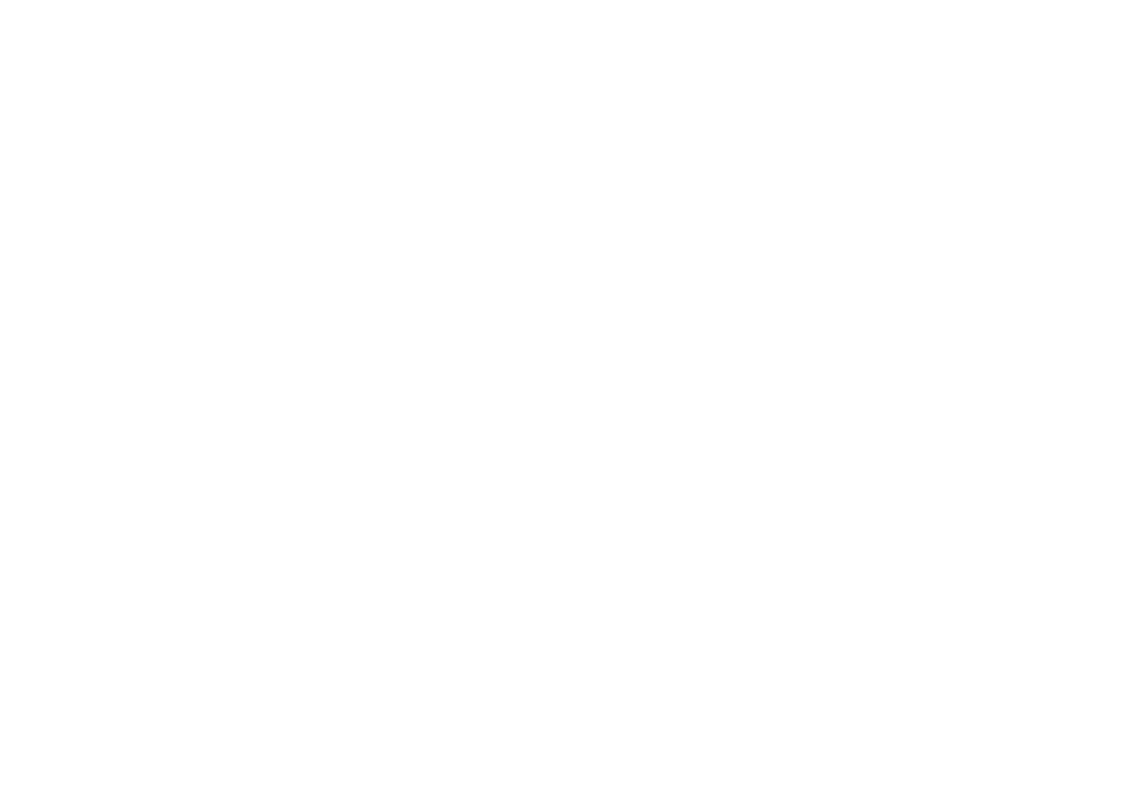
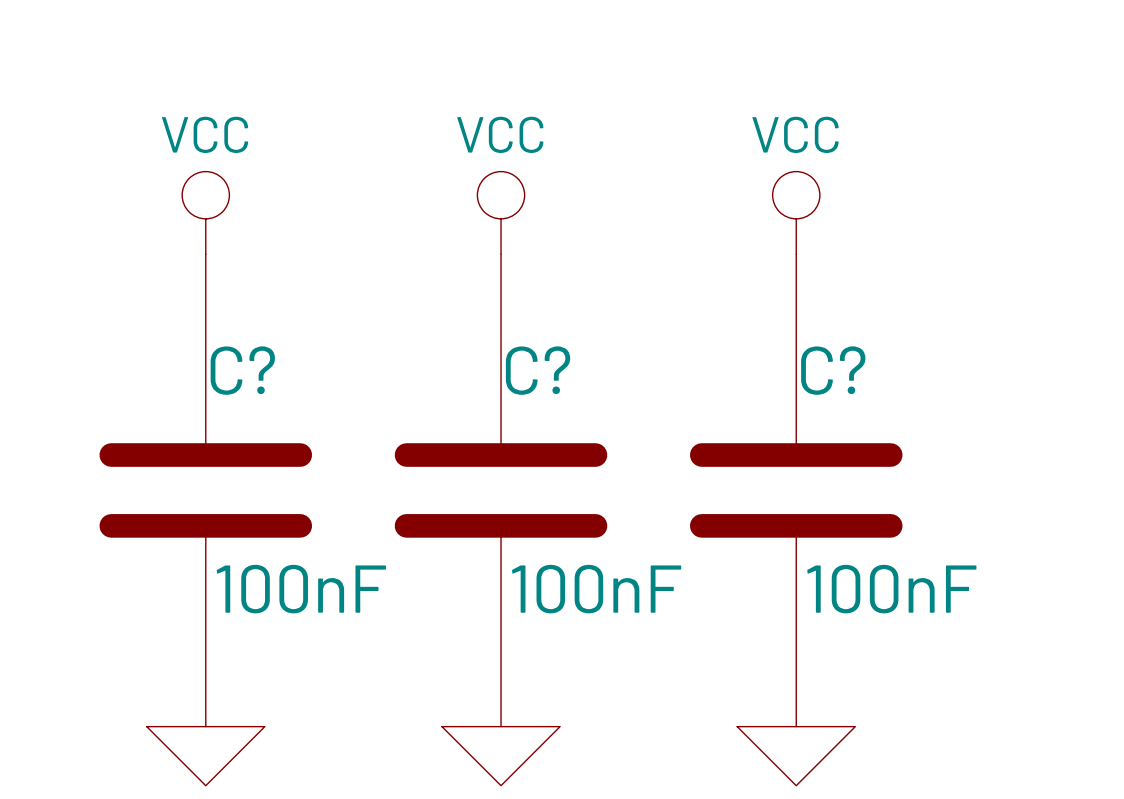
power symbol: none -> VCC (205, 212)
power symbol: none -> VCC (501, 212)
power symbol: none -> VCC (796, 212)
C?: none -> 100nF (205, 490)
C?: none -> 100nF (501, 490)
C?: none -> 100nF (796, 490)
power symbol: none -> (205, 756)
power symbol: none -> (501, 756)
power symbol: none -> (796, 756)

